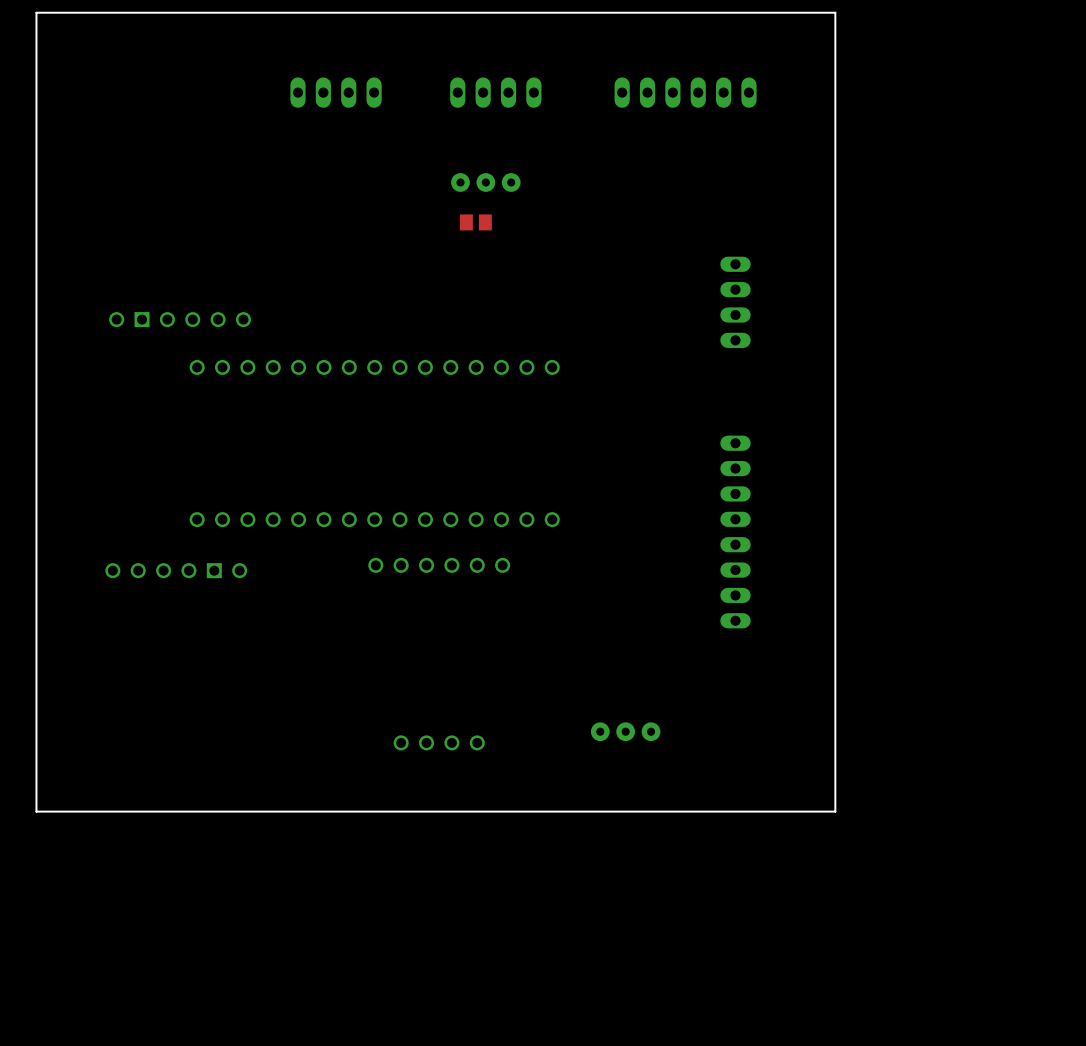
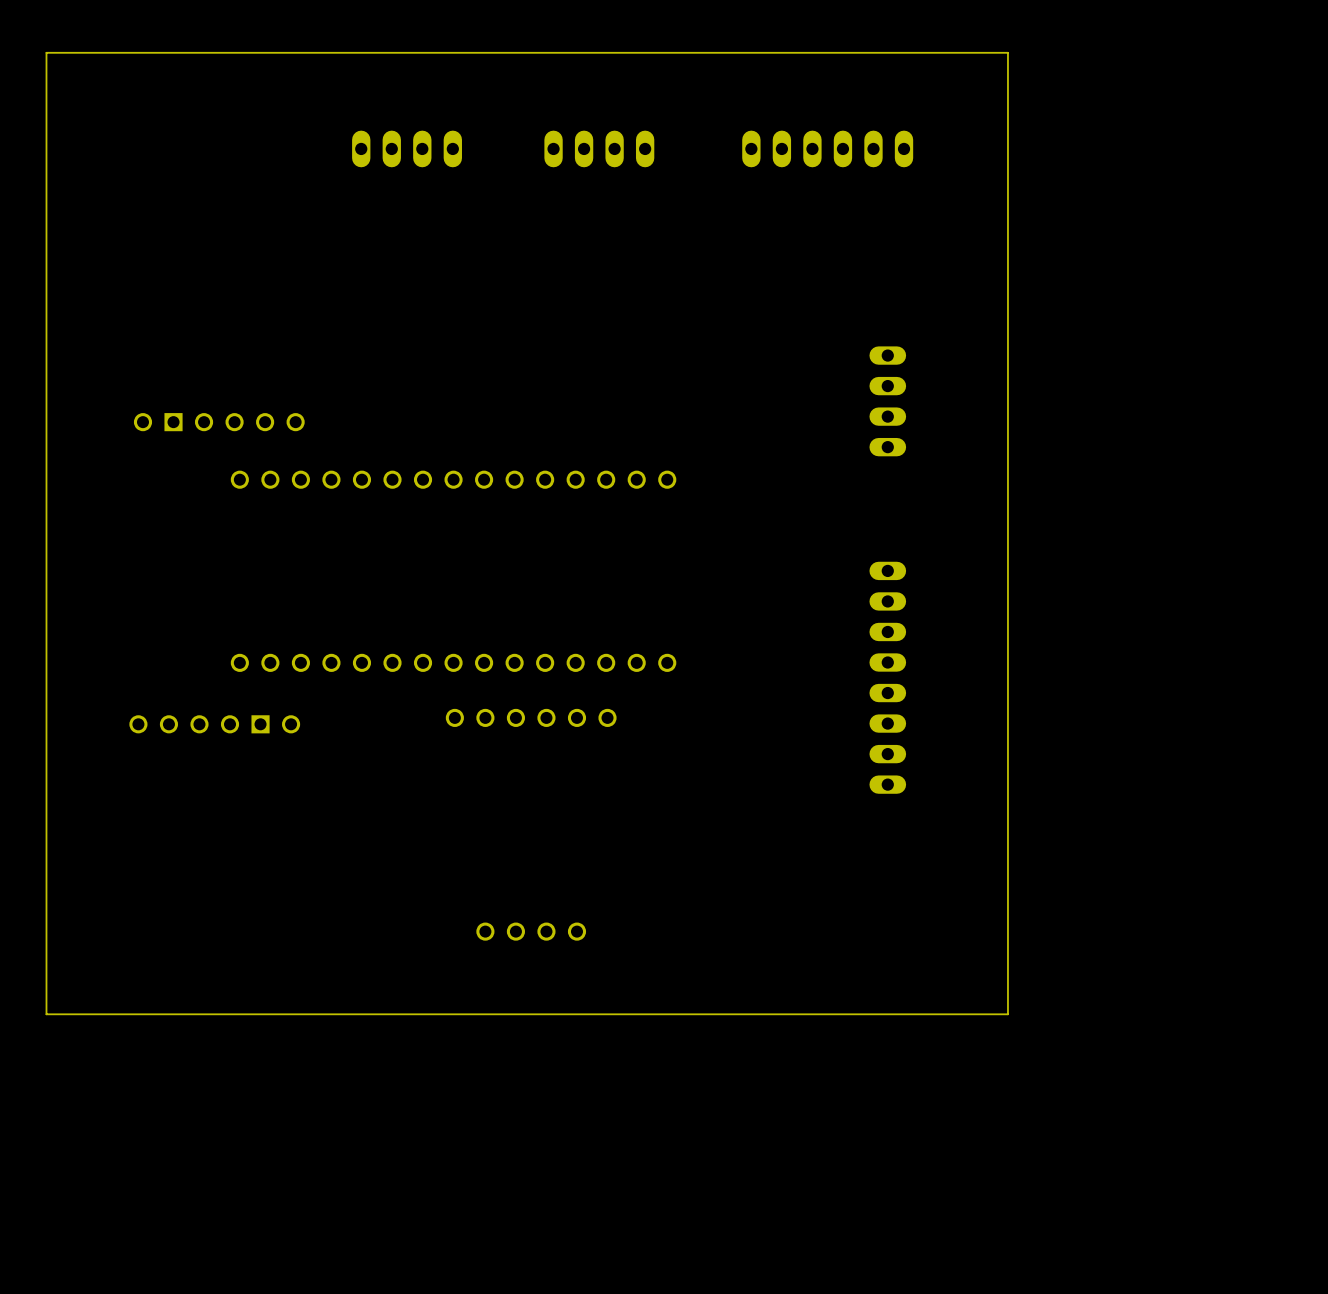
part: (485, 182) -> none
part: (475, 222) -> none
part: (625, 731) -> none

